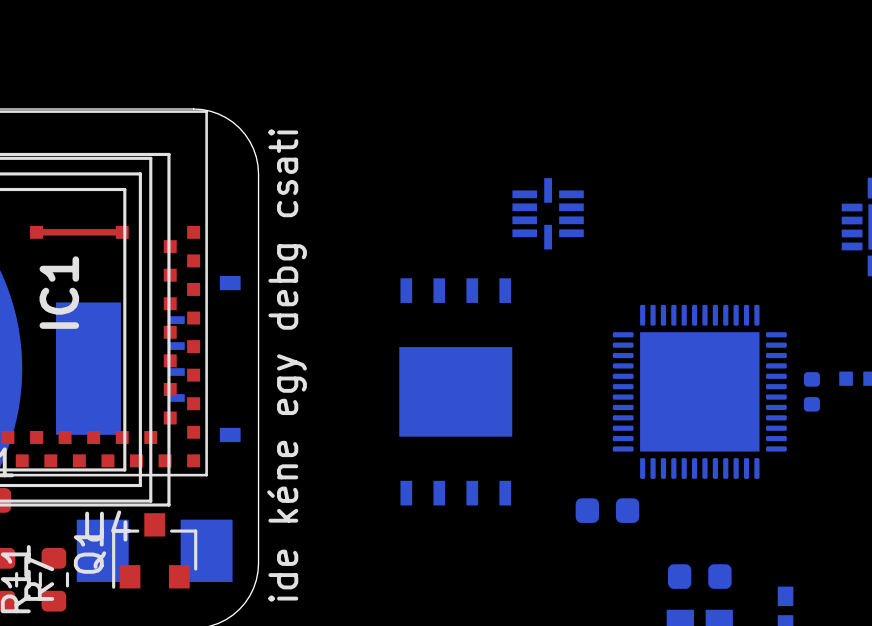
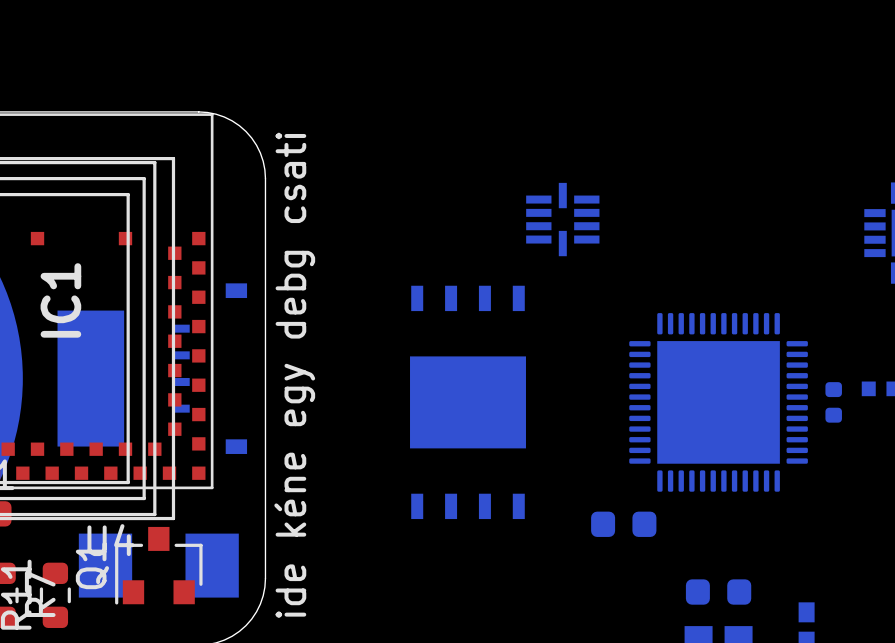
top track: (36, 232) (122, 232) -> none

